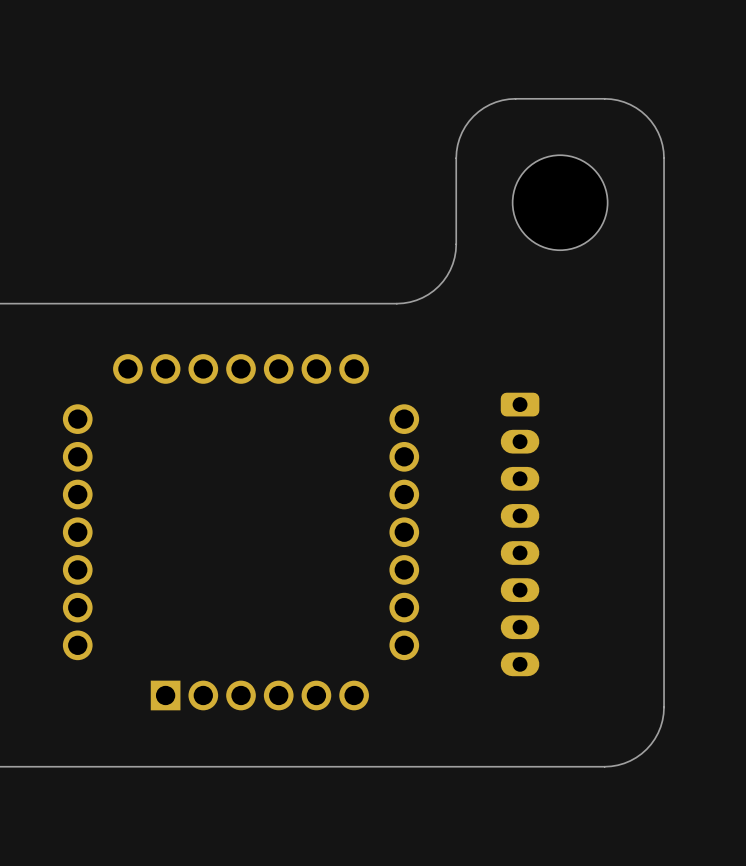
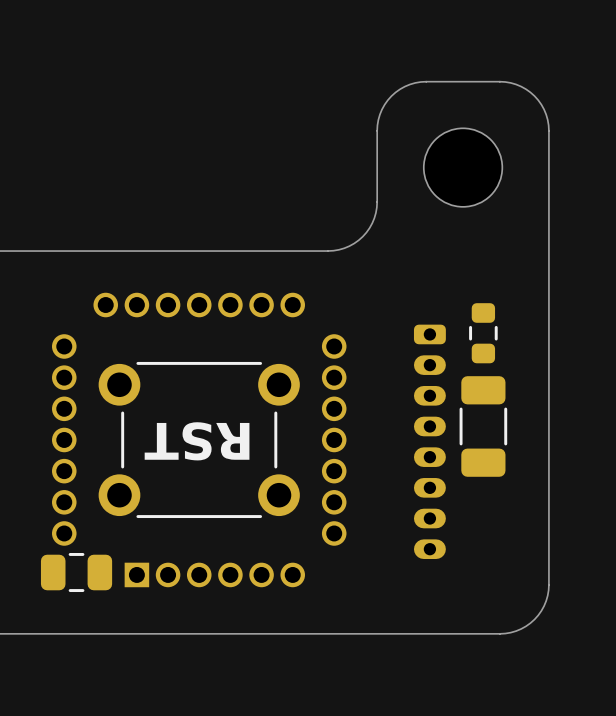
part: none -> (483, 333)
part: none -> (483, 426)
part: none -> (199, 439)
text: none -> RST (197, 441)
part: none -> (76, 572)

